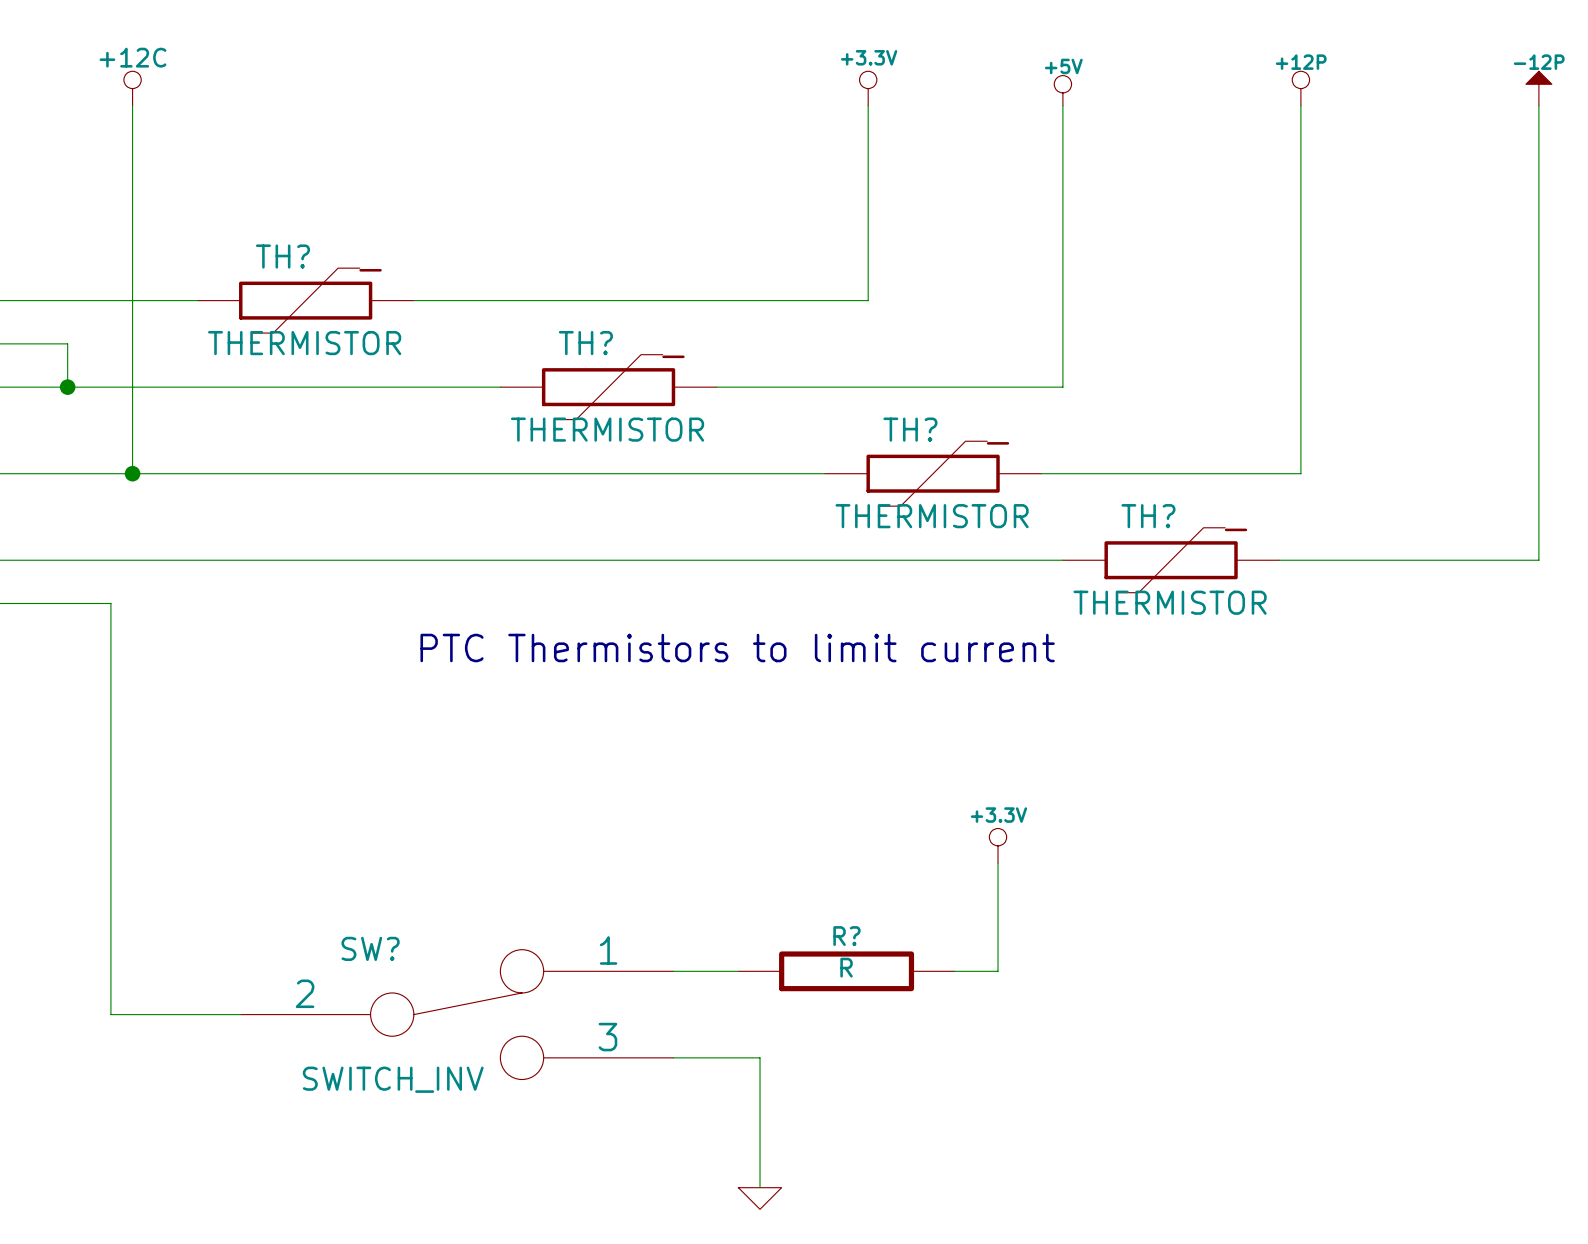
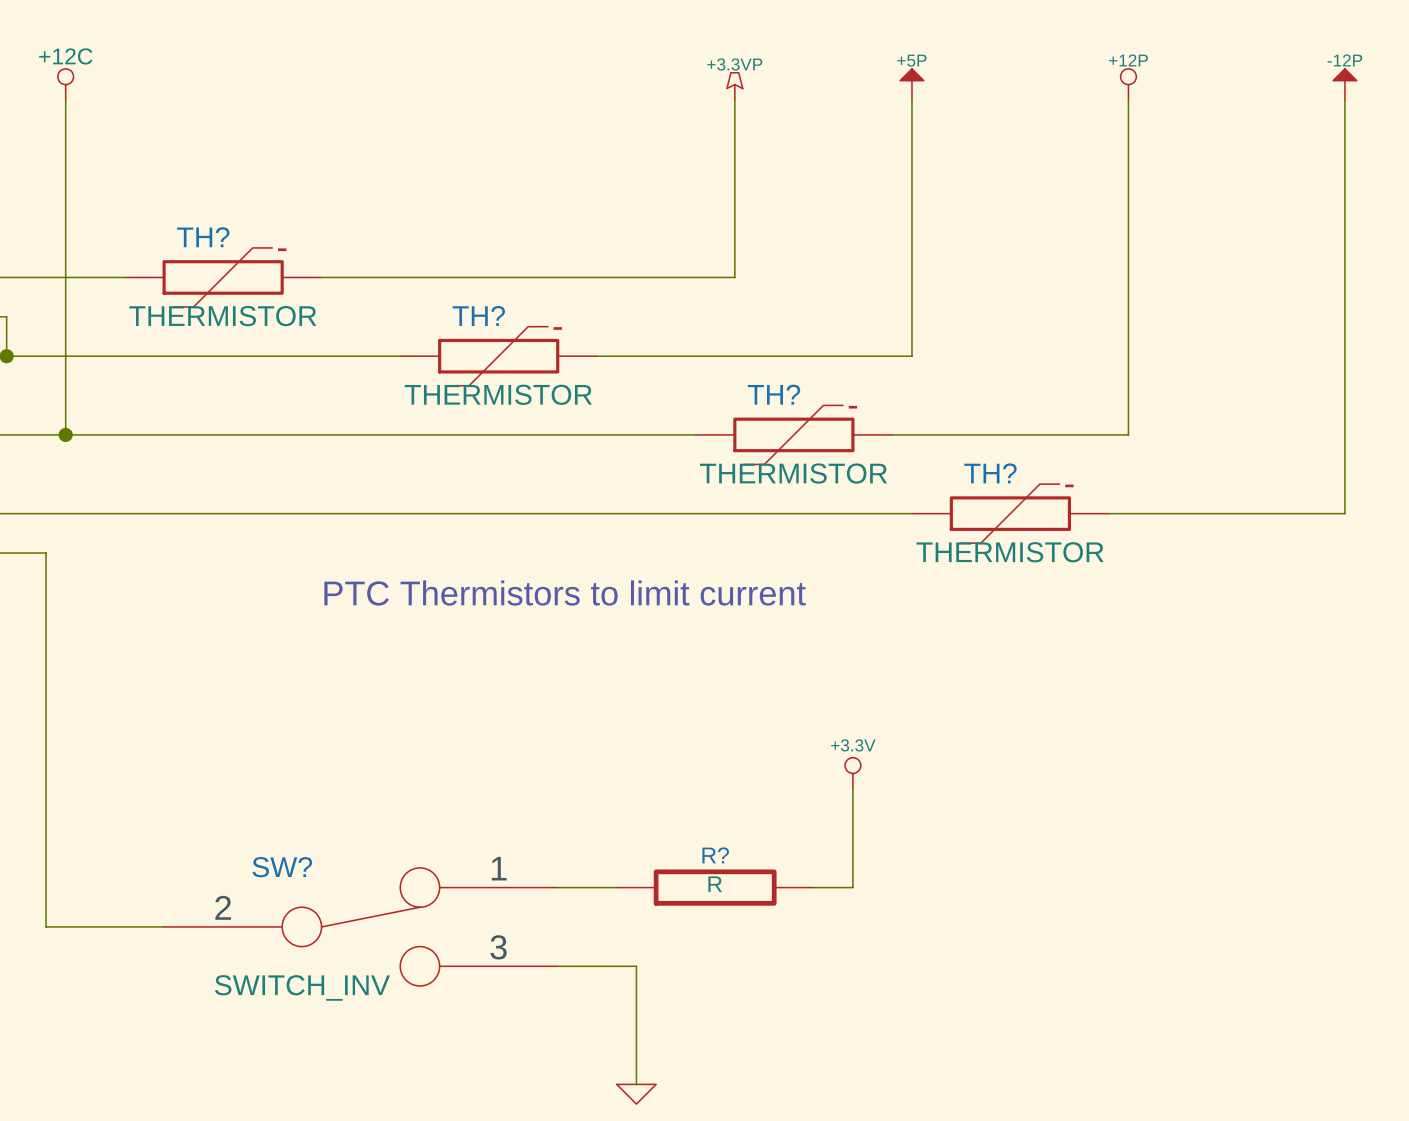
power symbol: +3.3V (868, 88) -> +3.3VP (734, 86)
power symbol: +5V (1062, 90) -> +5P (911, 84)

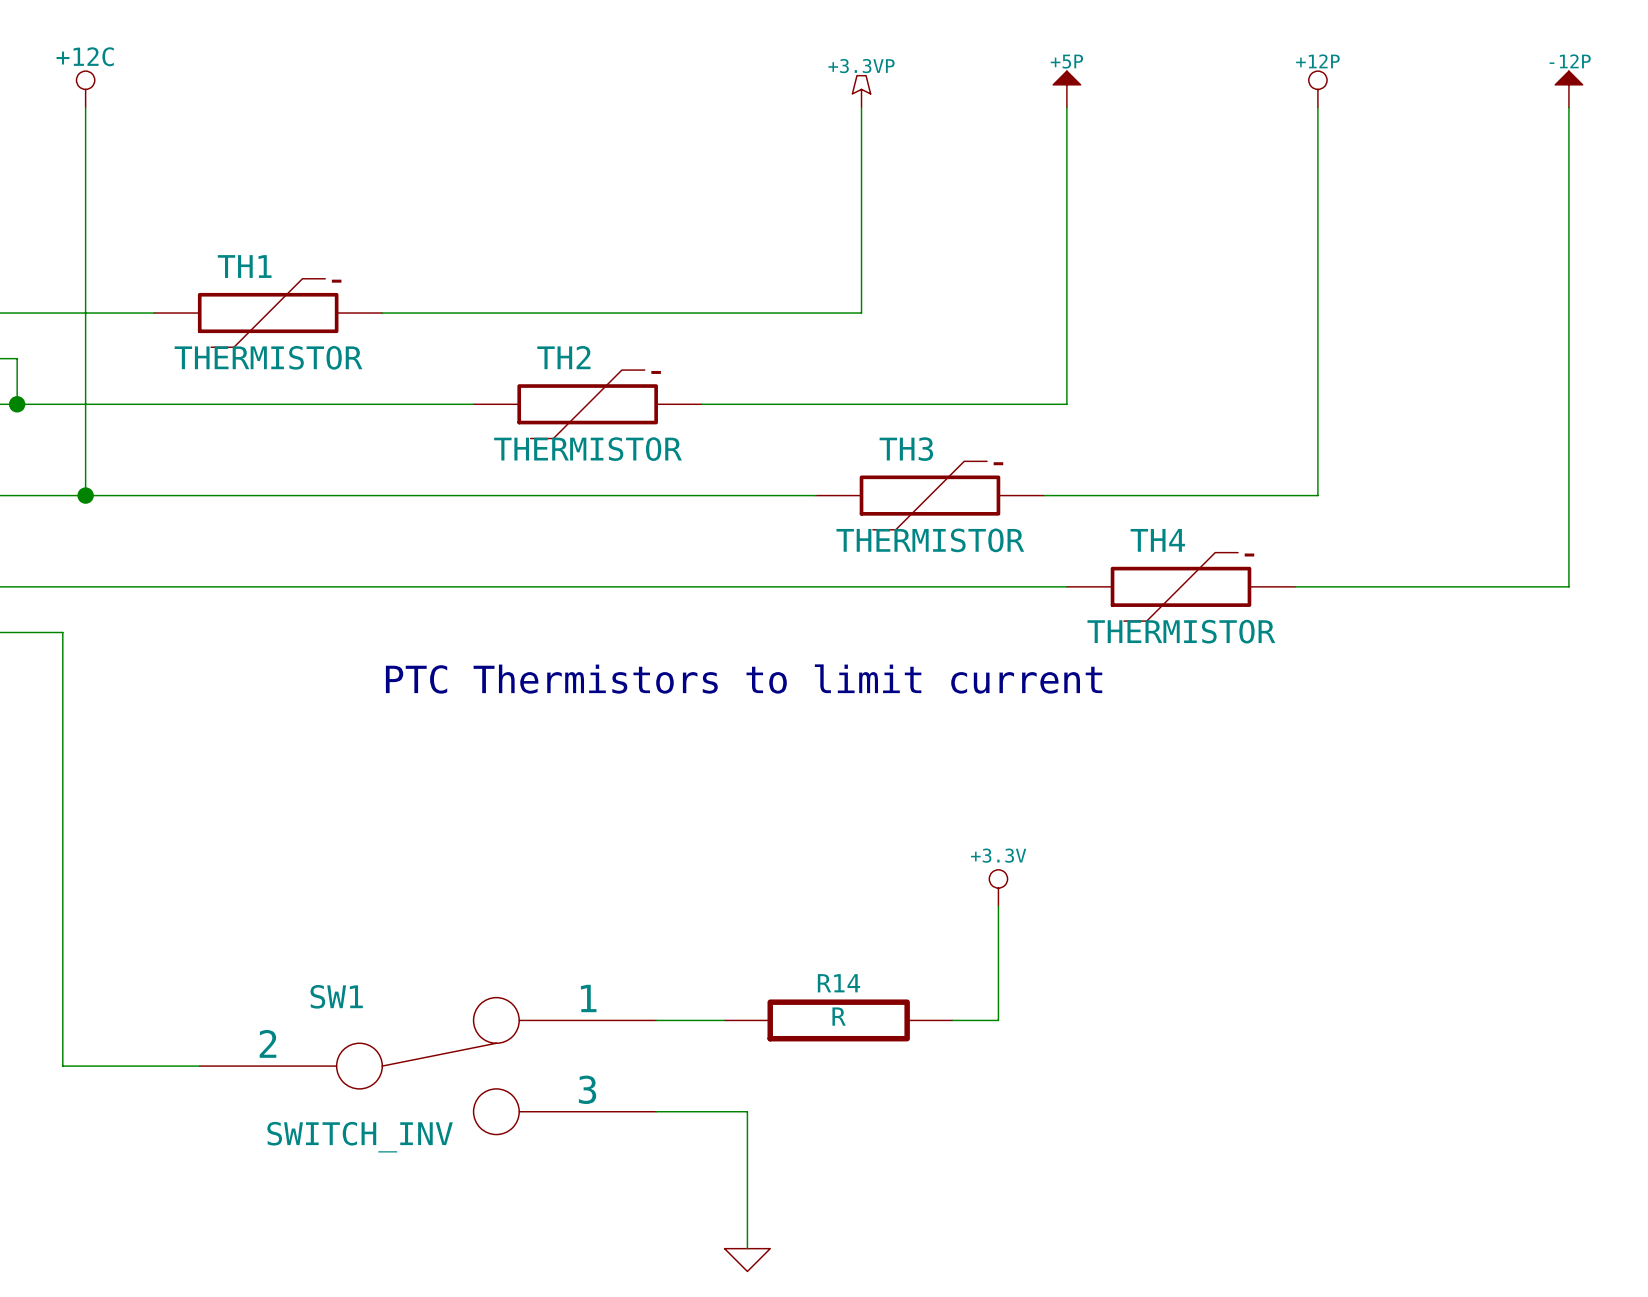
TH? name: TH? (203, 237) -> TH1 (244, 266)
TH? name: TH? (478, 315) -> TH2 (563, 357)
TH? name: TH? (774, 394) -> TH3 (906, 449)
TH? name: TH? (990, 473) -> TH4 (1157, 540)
R? name: R? (715, 855) -> R14 (838, 983)
SW? name: SW? (282, 867) -> SW1 (336, 996)

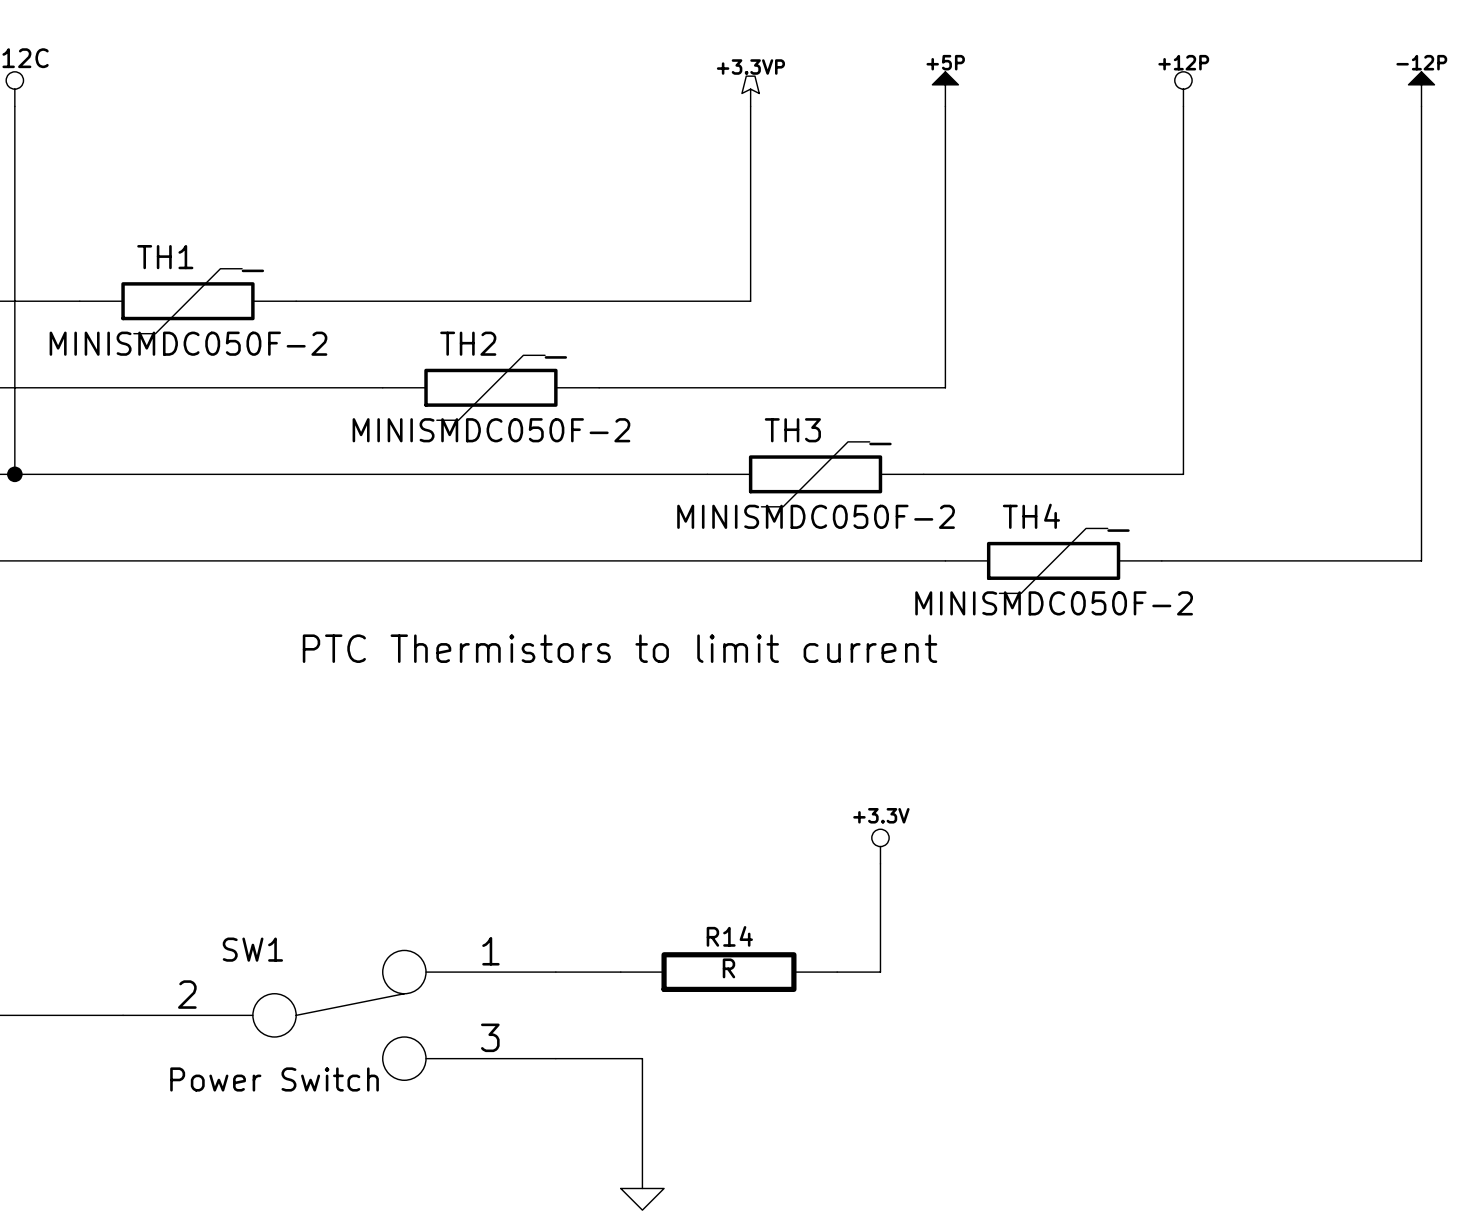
TH1 value: THERMISTOR (268, 357) -> MINISMDC050F-2 (188, 343)
TH2 value: THERMISTOR (588, 449) -> MINISMDC050F-2 (491, 430)
TH3 value: THERMISTOR (930, 540) -> MINISMDC050F-2 (816, 516)
TH4 value: THERMISTOR (1181, 631) -> MINISMDC050F-2 (1054, 603)
SW1 value: SWITCH_INV (360, 1137) -> Power Switch (274, 1079)

